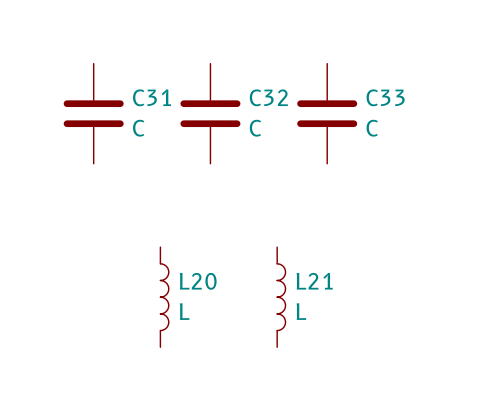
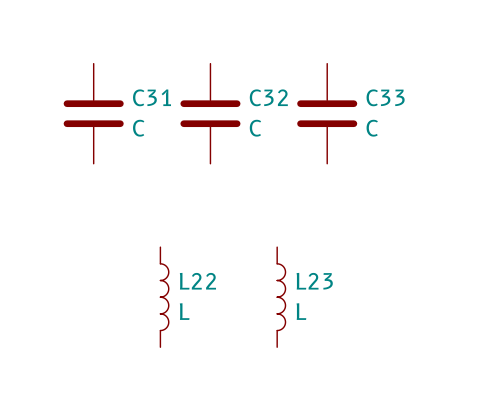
L20 name: L20 (198, 281) -> L22 (197, 281)
L21 name: L21 (314, 281) -> L23 (314, 281)

